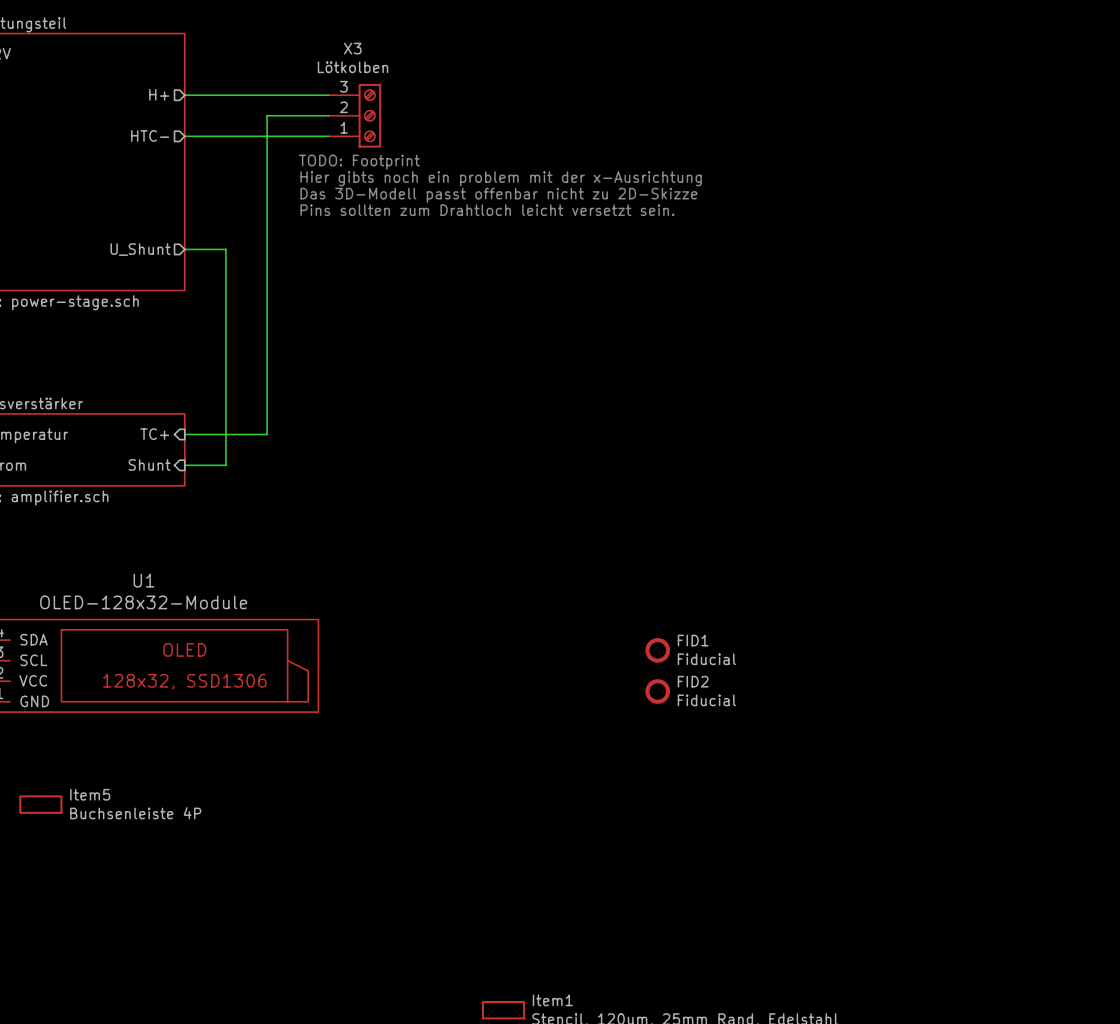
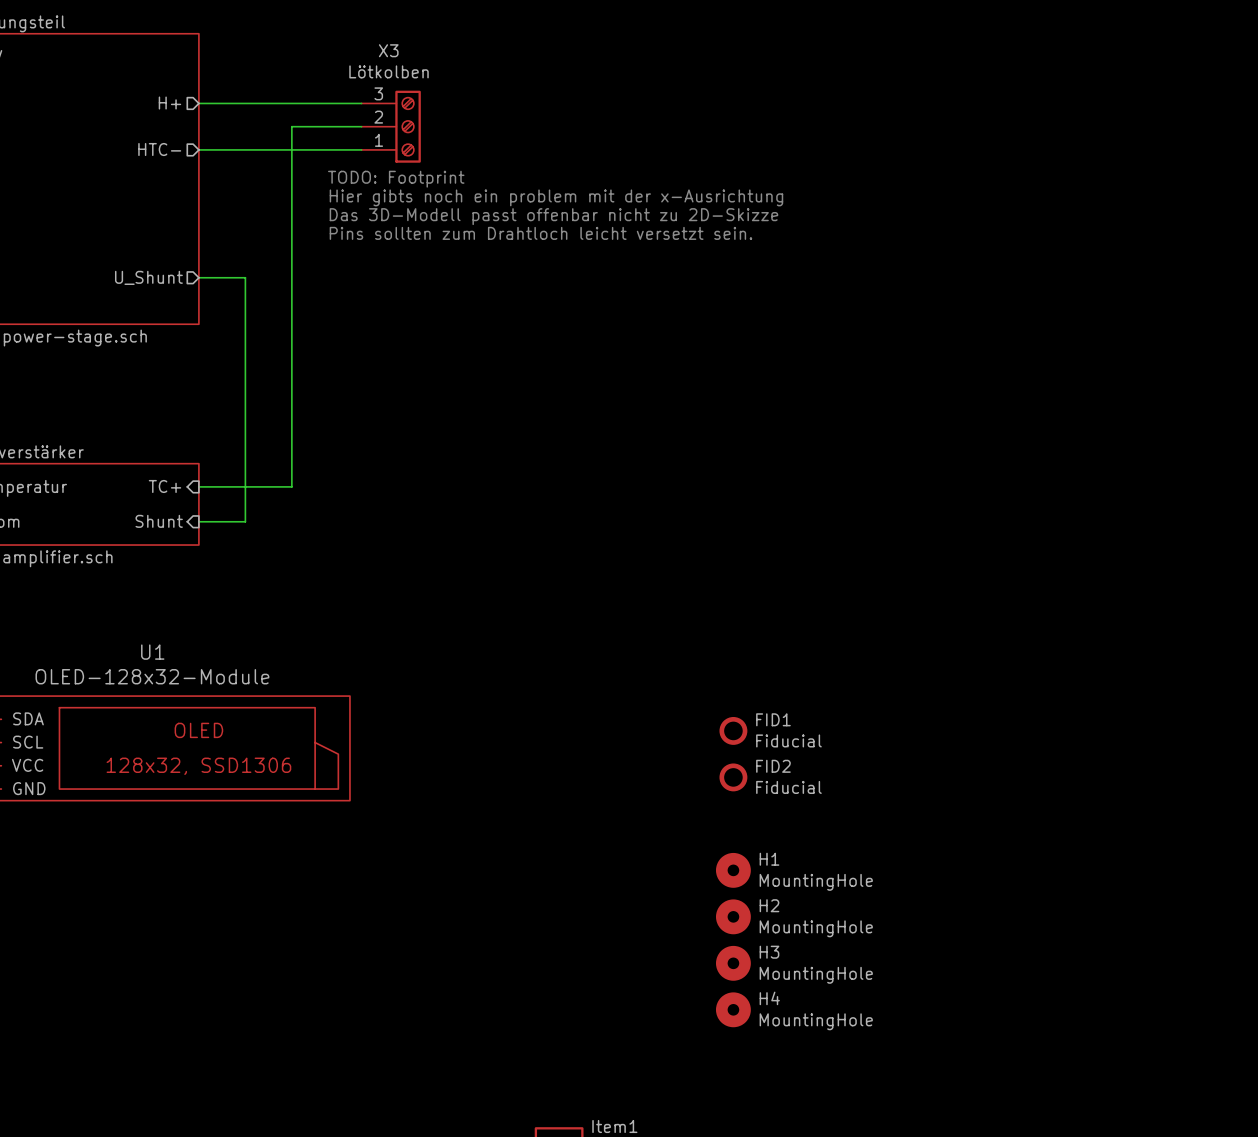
H1: none -> MountingHole (733, 870)
Item5: Buchsenleiste 4P (40, 804) -> none
H2: none -> MountingHole (733, 916)
H3: none -> MountingHole (733, 963)
H4: none -> MountingHole (733, 1009)

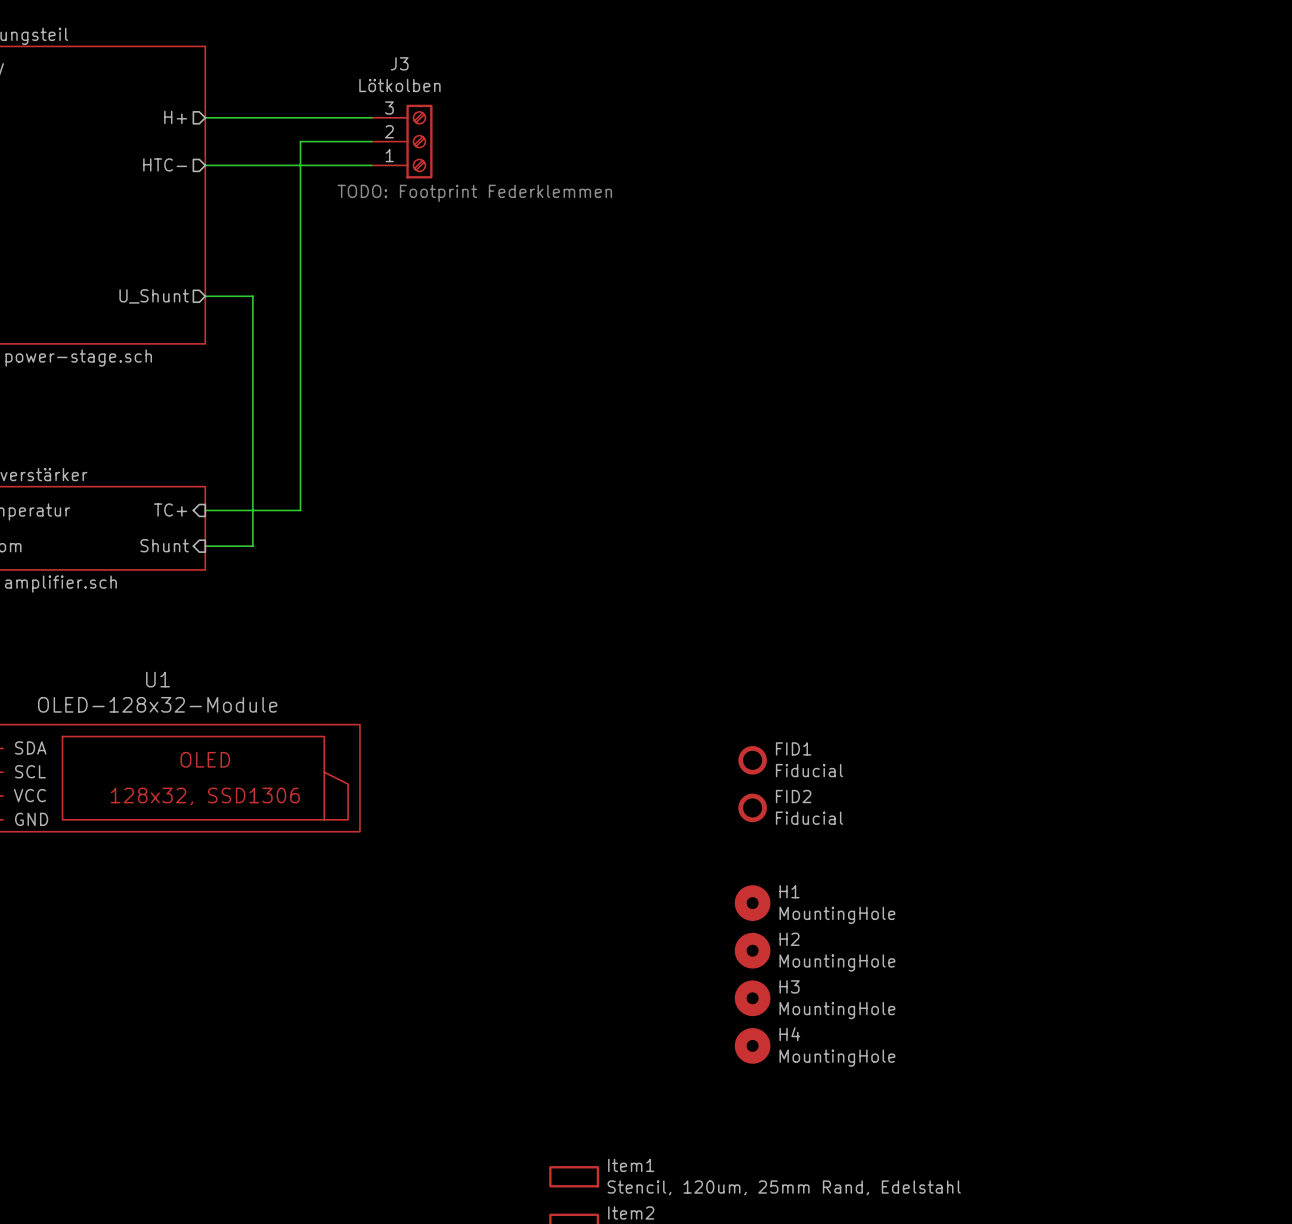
X3 name: X3 (388, 50) -> J3 (399, 63)
text: TODO: Footprint (396, 179) -> TODO: Footprint Federklemmen (474, 193)
text: Hier gibts noch ein problem mit der x-Ausrichtung (556, 197) -> none
text: Das 3D-Modell passt offenbar nicht zu 2D-Skizze (553, 216) -> none
text: Pins sollten zum Drahtloch leicht versetzt sein. (540, 233) -> none

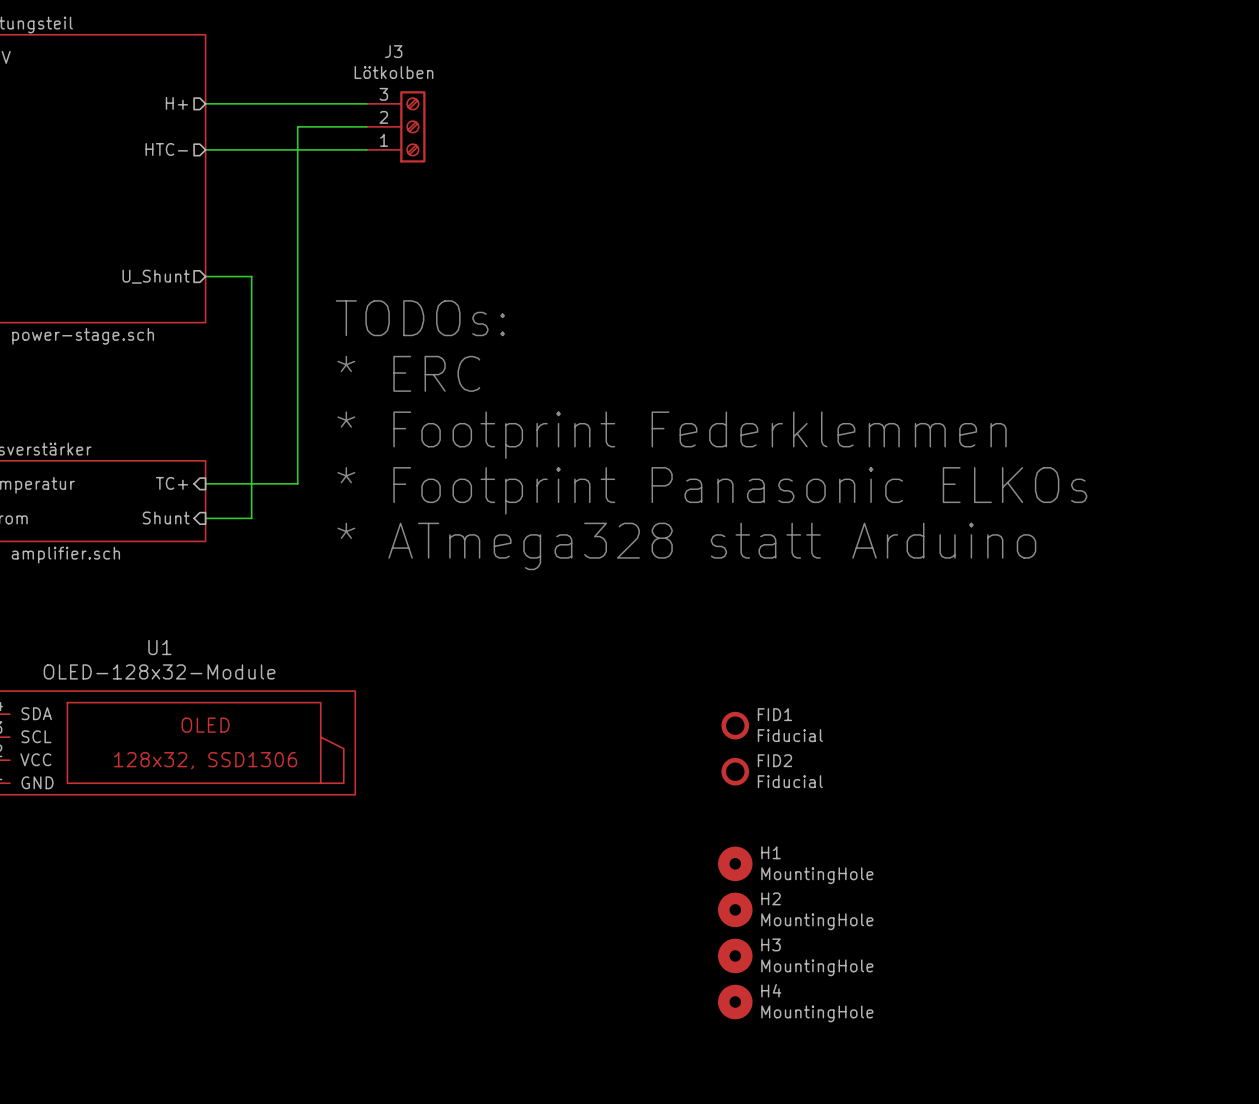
text: TODO: Footprint Federklemmen (474, 193) -> none
text: none -> TODOs: (420, 318)
text: none -> * ERC (408, 373)
text: none -> * Footprint Federklemmen (672, 435)
text: none -> * Footprint Panasonic ELKOs (712, 490)
text: none -> * ATmega328 statt Arduino (686, 546)

